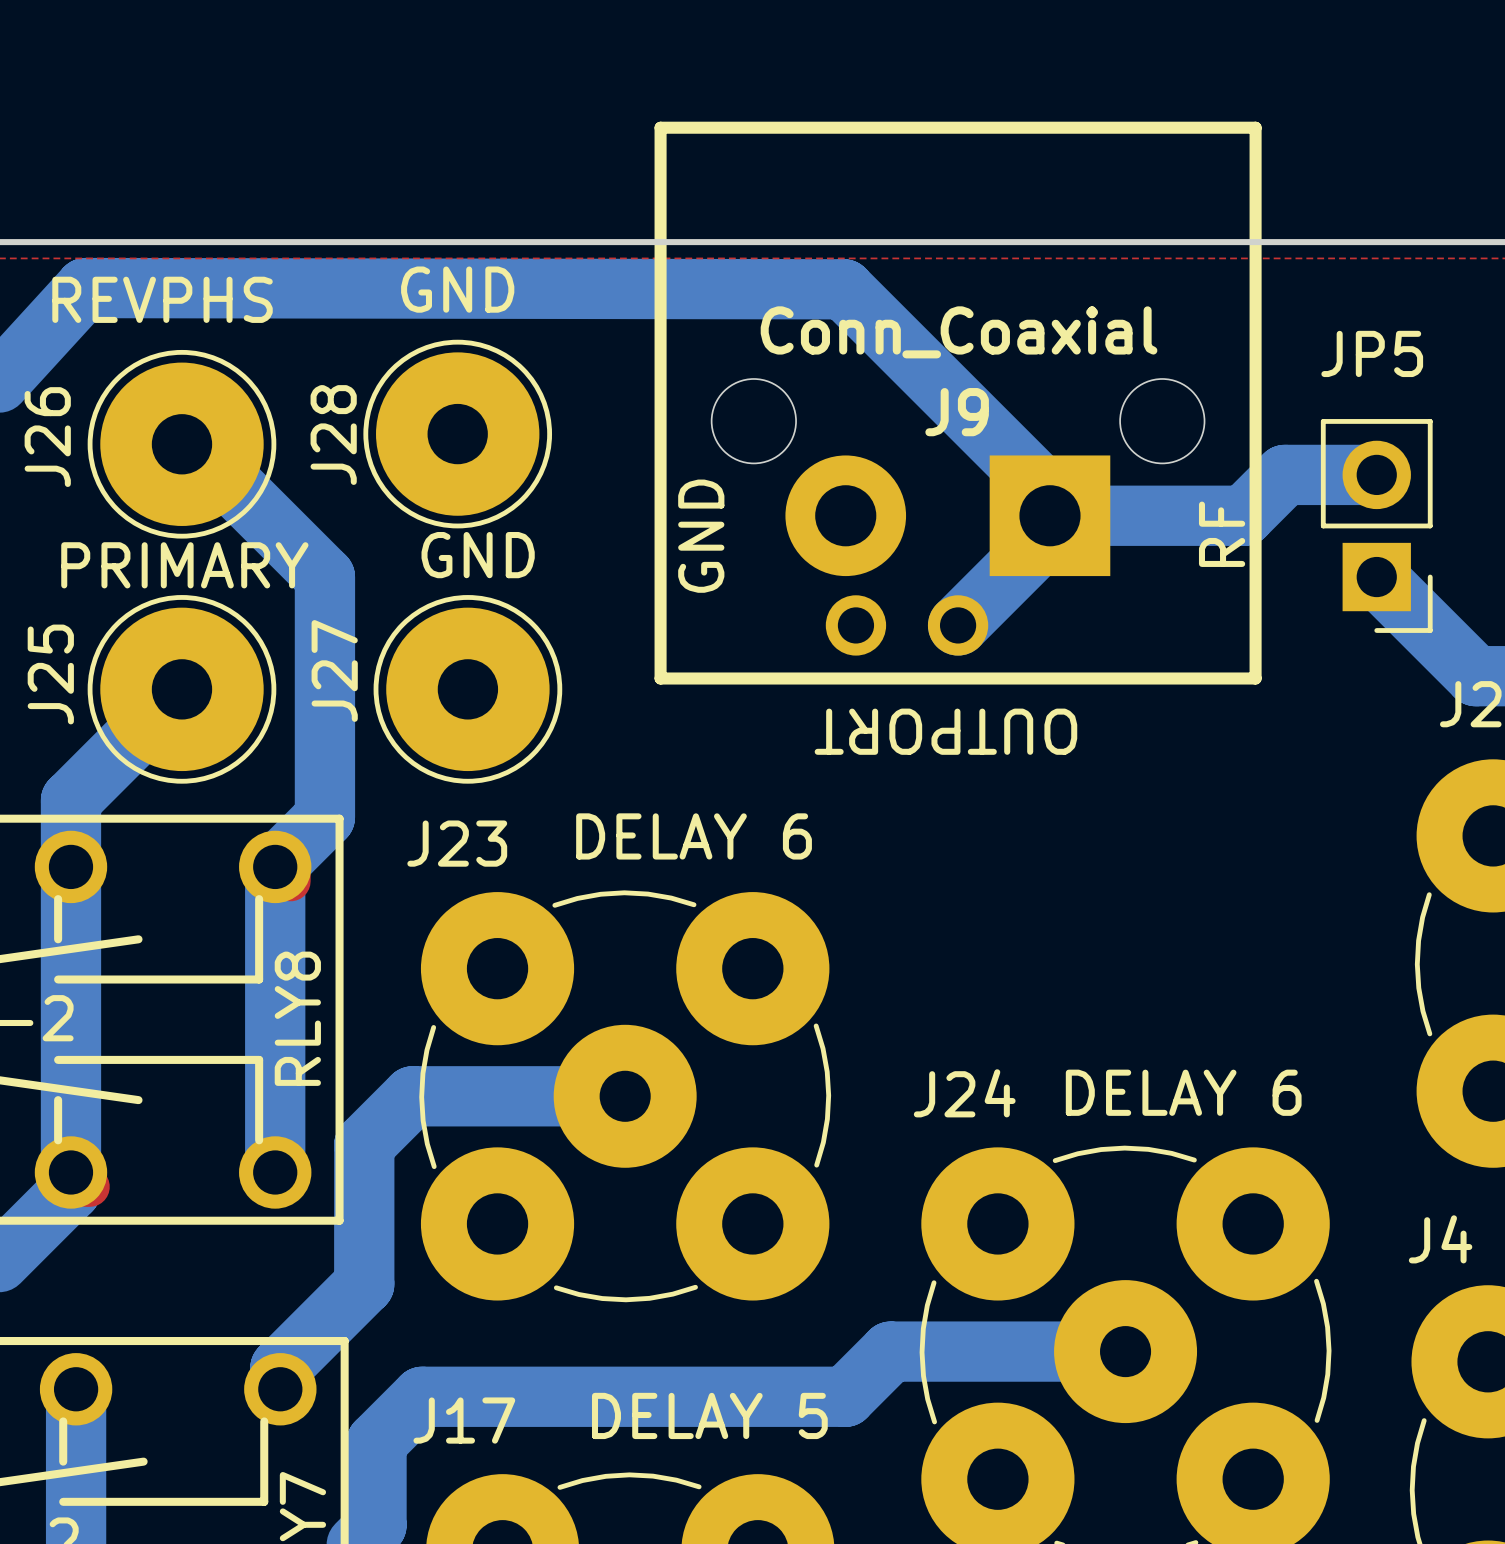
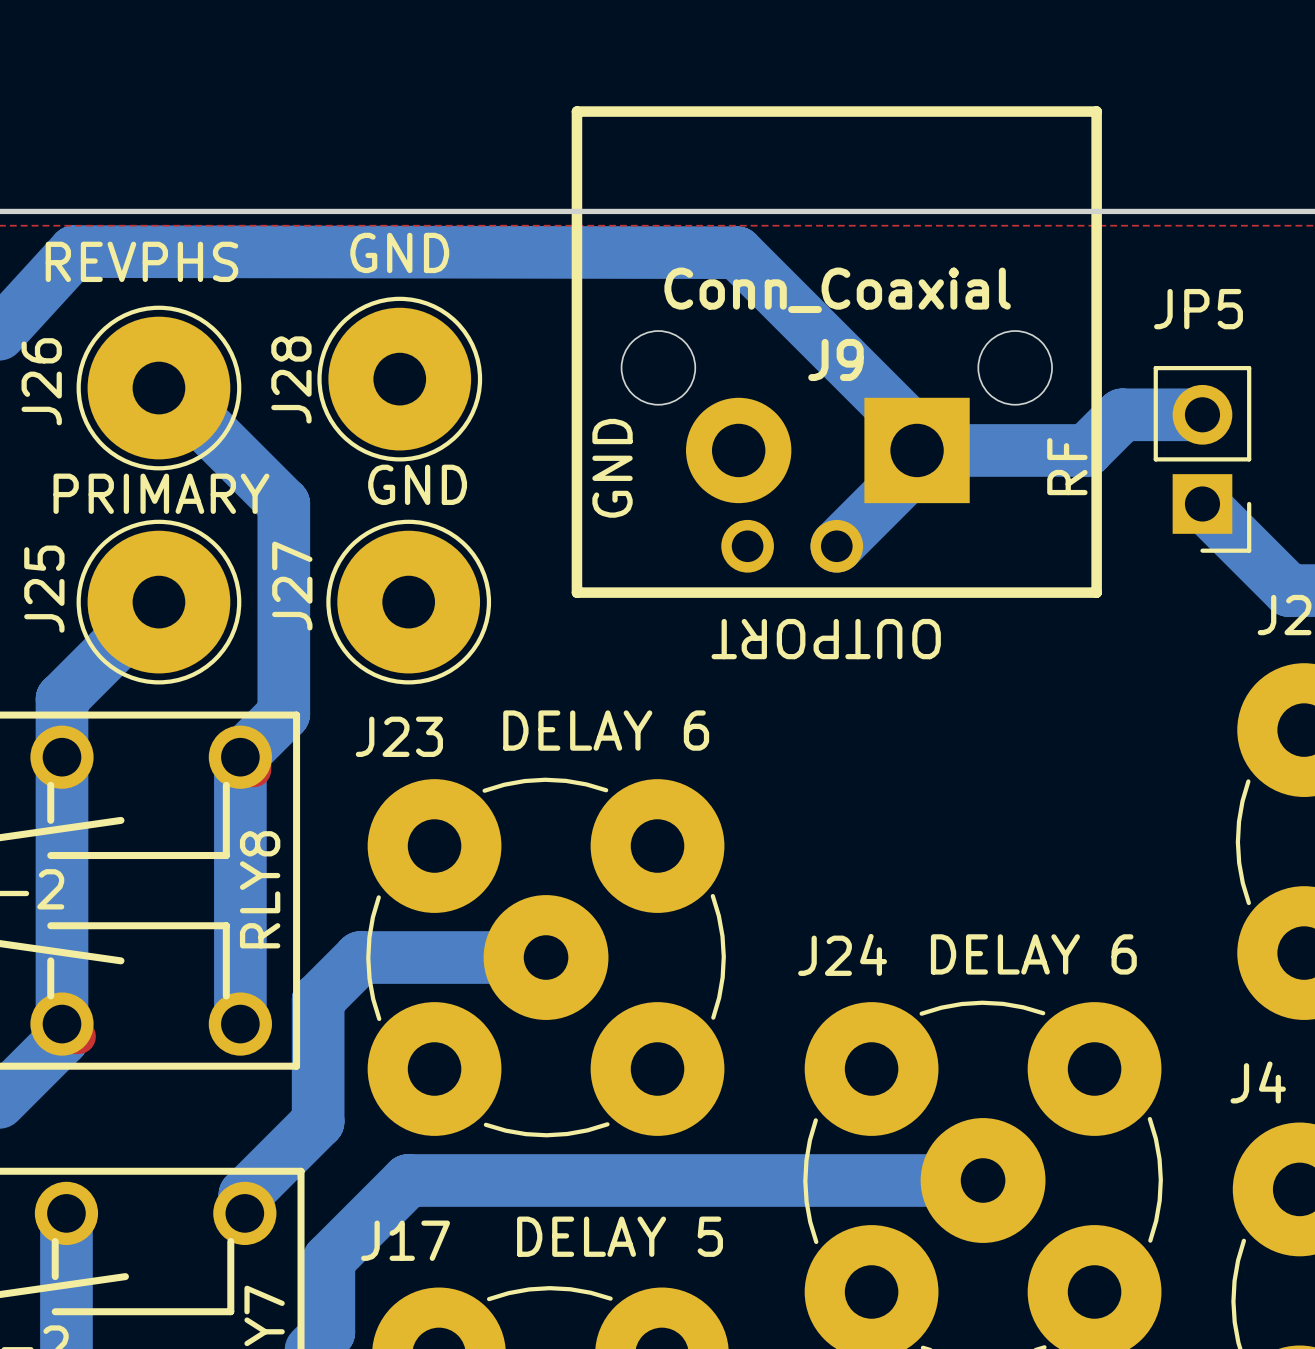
bottom track: (890, 1351) (845, 1396) (422, 1396) -> (777, 1180) (408, 1180) (368, 1219)

